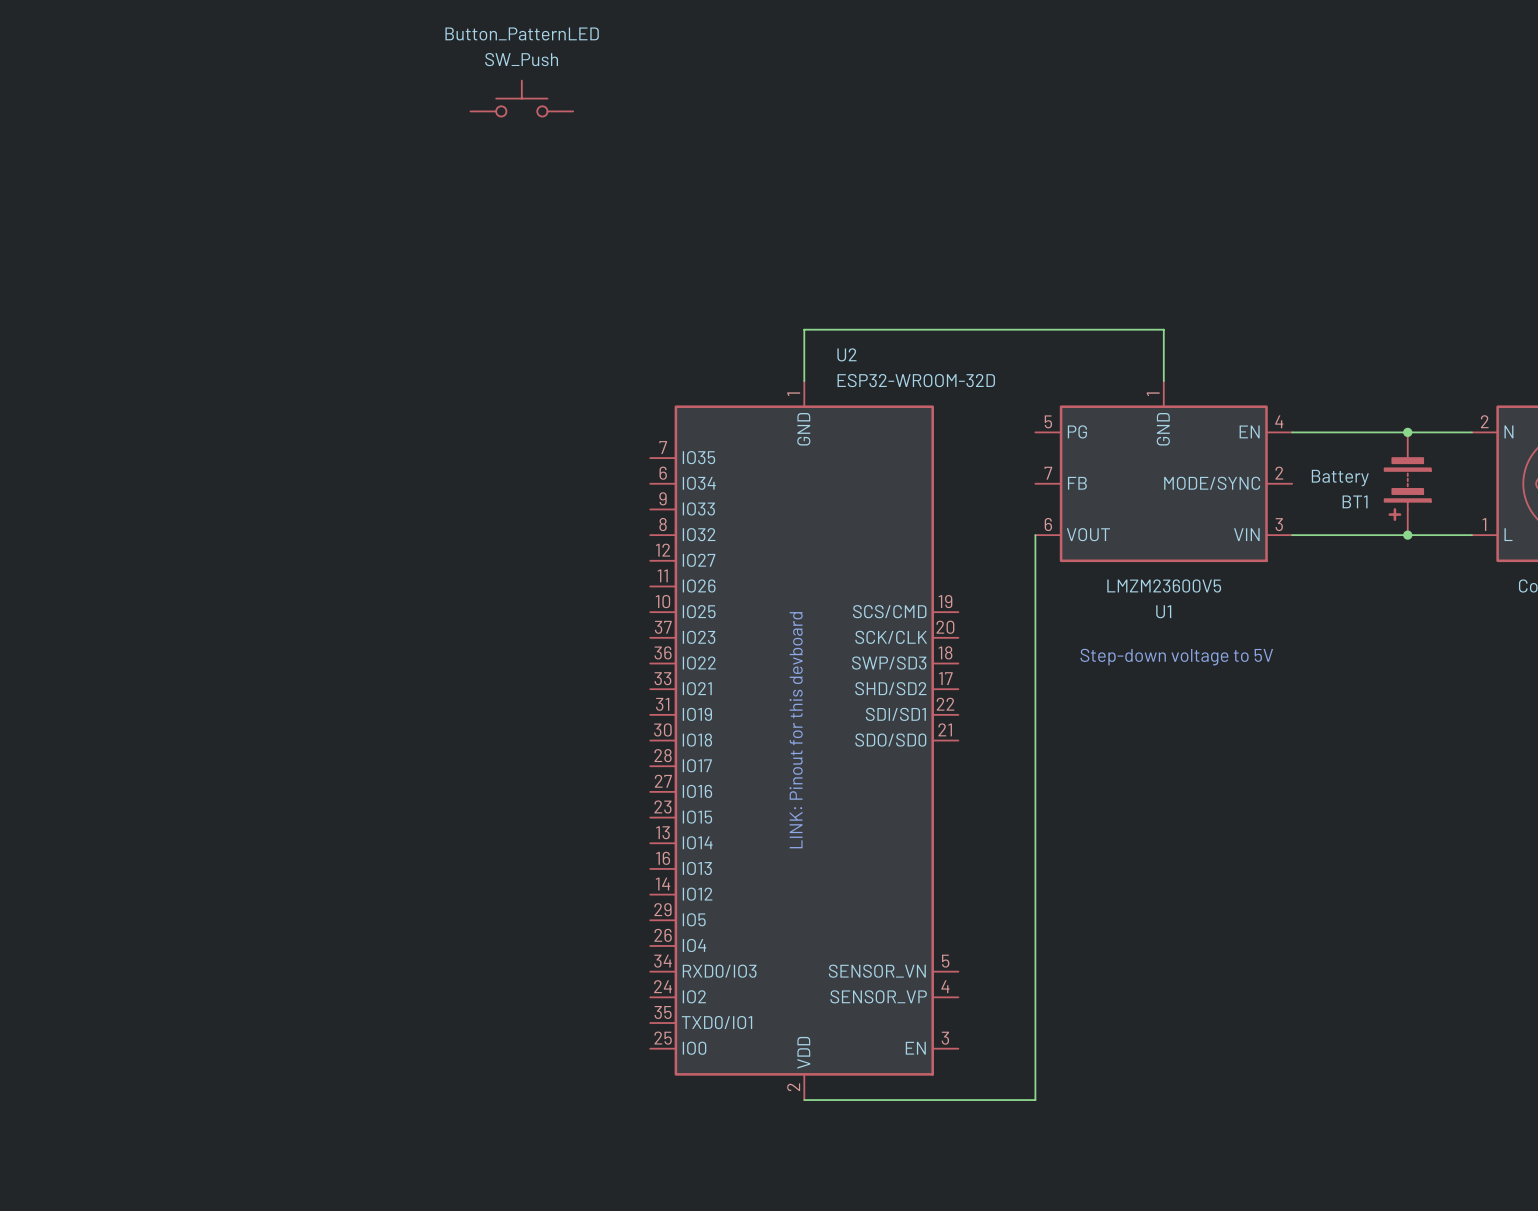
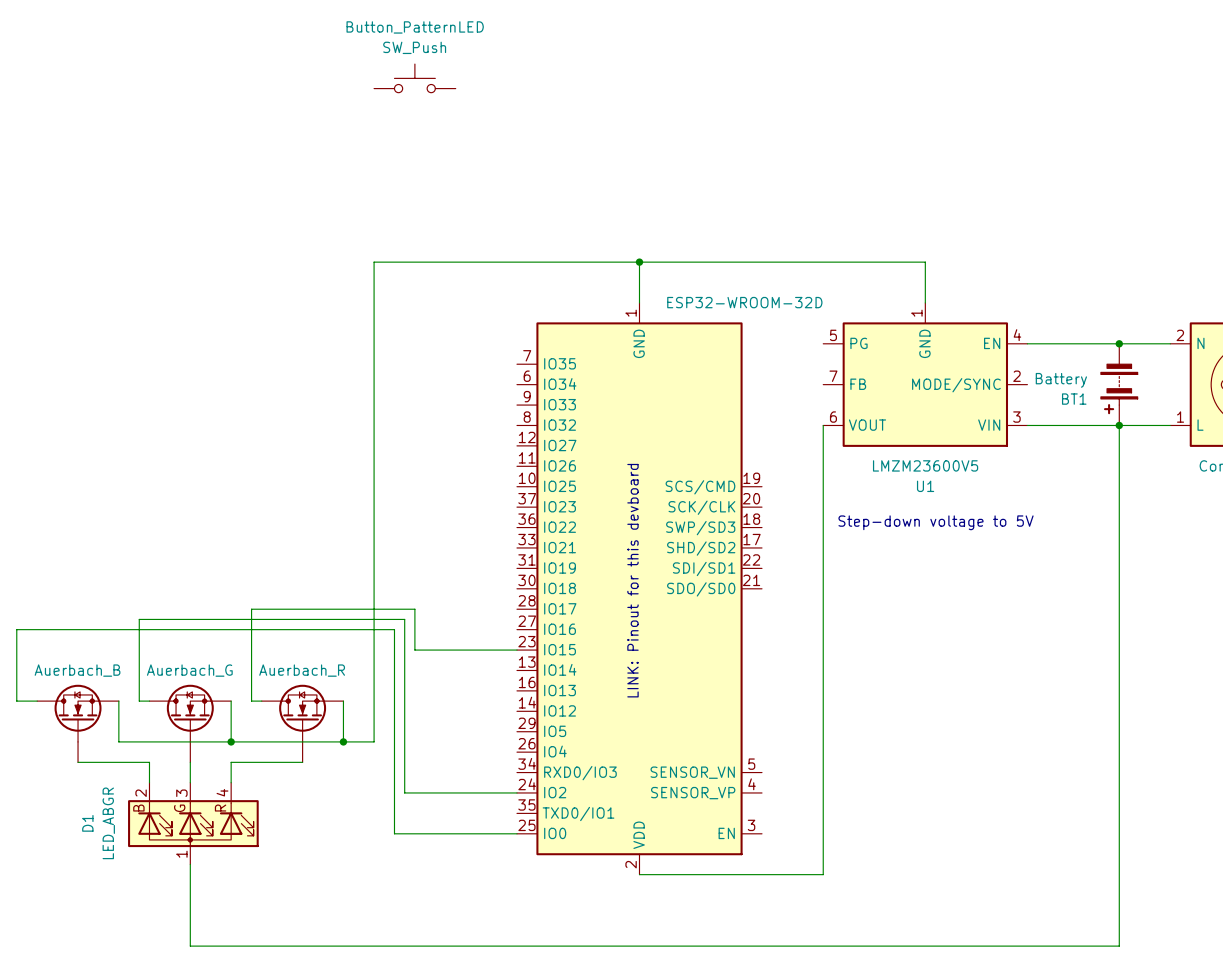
wire: none -> (639, 262) (374, 262) (374, 741) (118, 741) (118, 701)
junction: none -> (639, 262)
U2 name: U2 (846, 354) -> none
wire: none -> (1119, 425) (1119, 946) (190, 946) (190, 864)
wire: none -> (516, 650) (414, 650) (414, 609) (251, 609) (251, 701) (261, 701)
wire: none -> (37, 701) (16, 701) (16, 629) (394, 629) (394, 833) (516, 833)
wire: none -> (149, 701) (139, 701) (139, 619) (404, 619) (404, 792) (516, 792)
wire: none -> (231, 701) (231, 741)
wire: none -> (343, 701) (343, 741)
part: none -> Auerbach_B (78, 723)
part: none -> Auerbach_G (190, 723)
part: none -> Auerbach_R (302, 723)
junction: none -> (231, 741)
junction: none -> (343, 741)
wire: none -> (78, 762) (149, 762) (149, 782)
wire: none -> (190, 762) (190, 782)
wire: none -> (302, 762) (231, 762) (231, 782)
D1: none -> LED_ABGR (193, 823)

